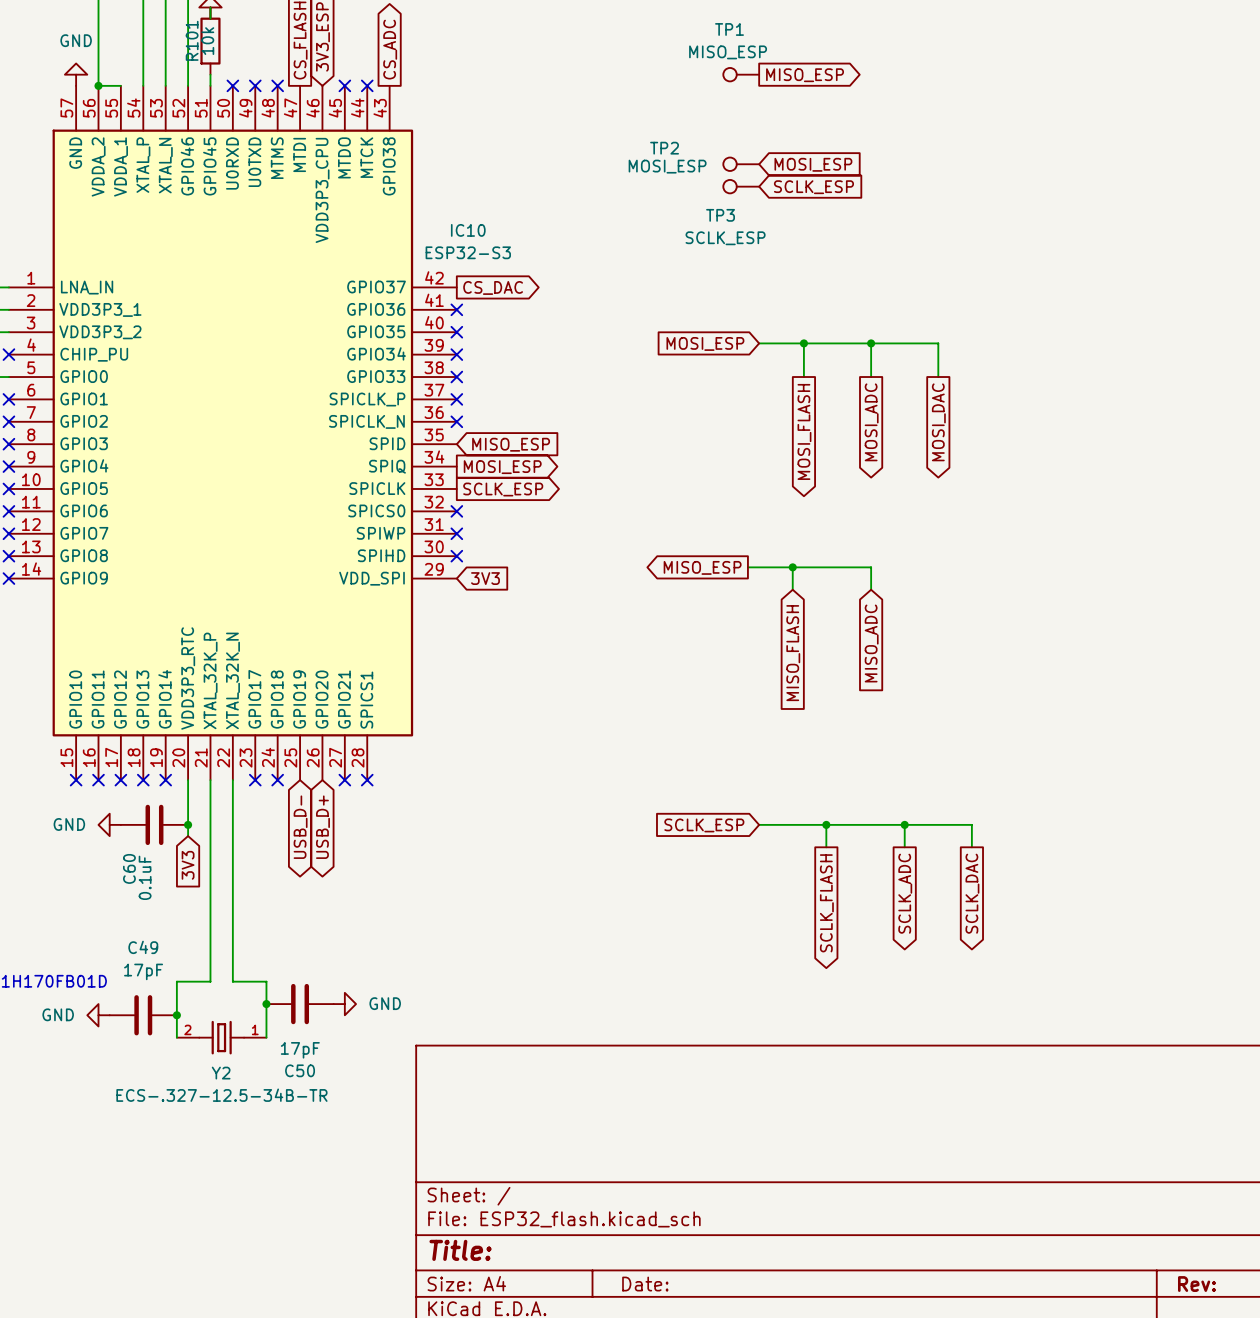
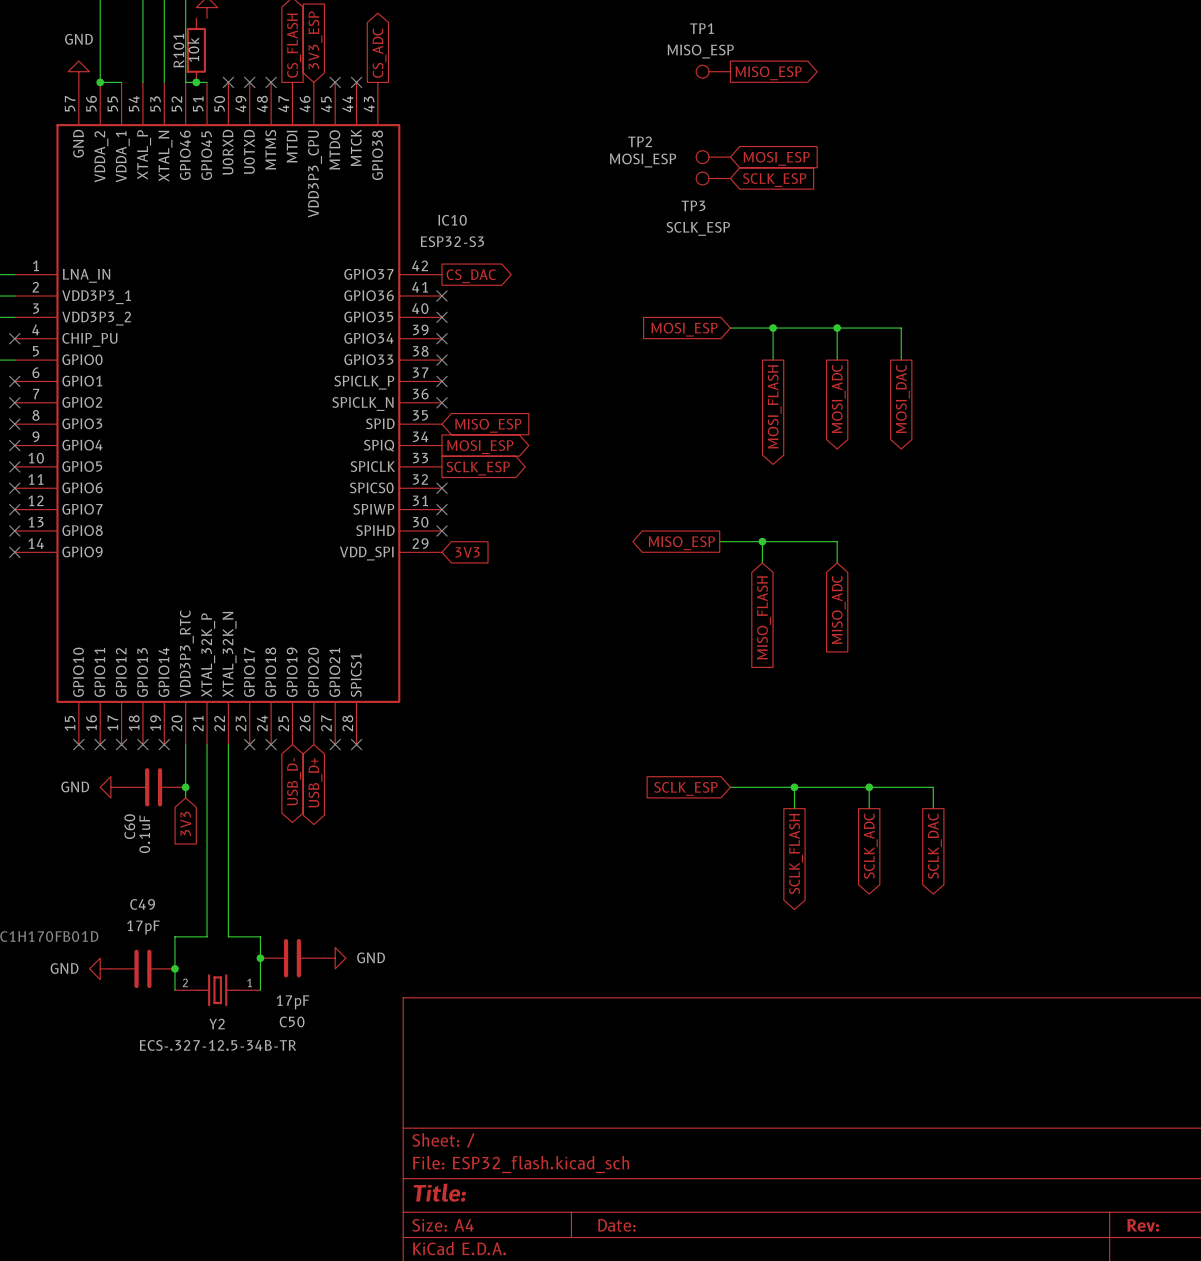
R101 position: (210, 41) -> (196, 50)
wire: (210, 74) (210, 85) -> (185, 82) (207, 82)
junction: none -> (196, 82)

